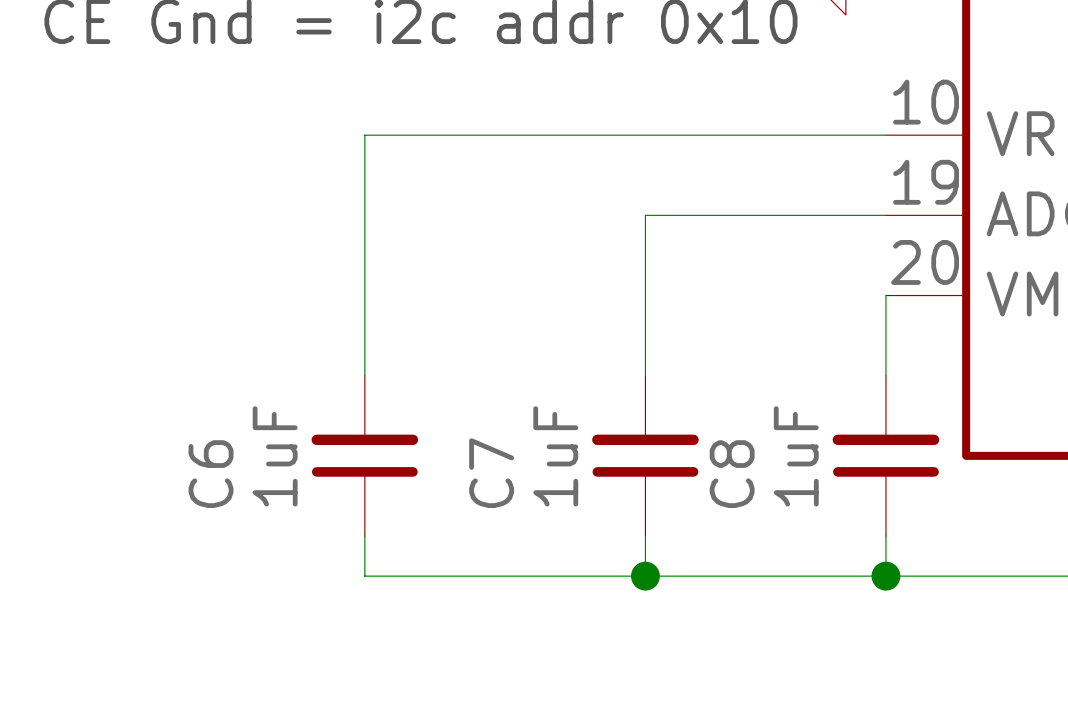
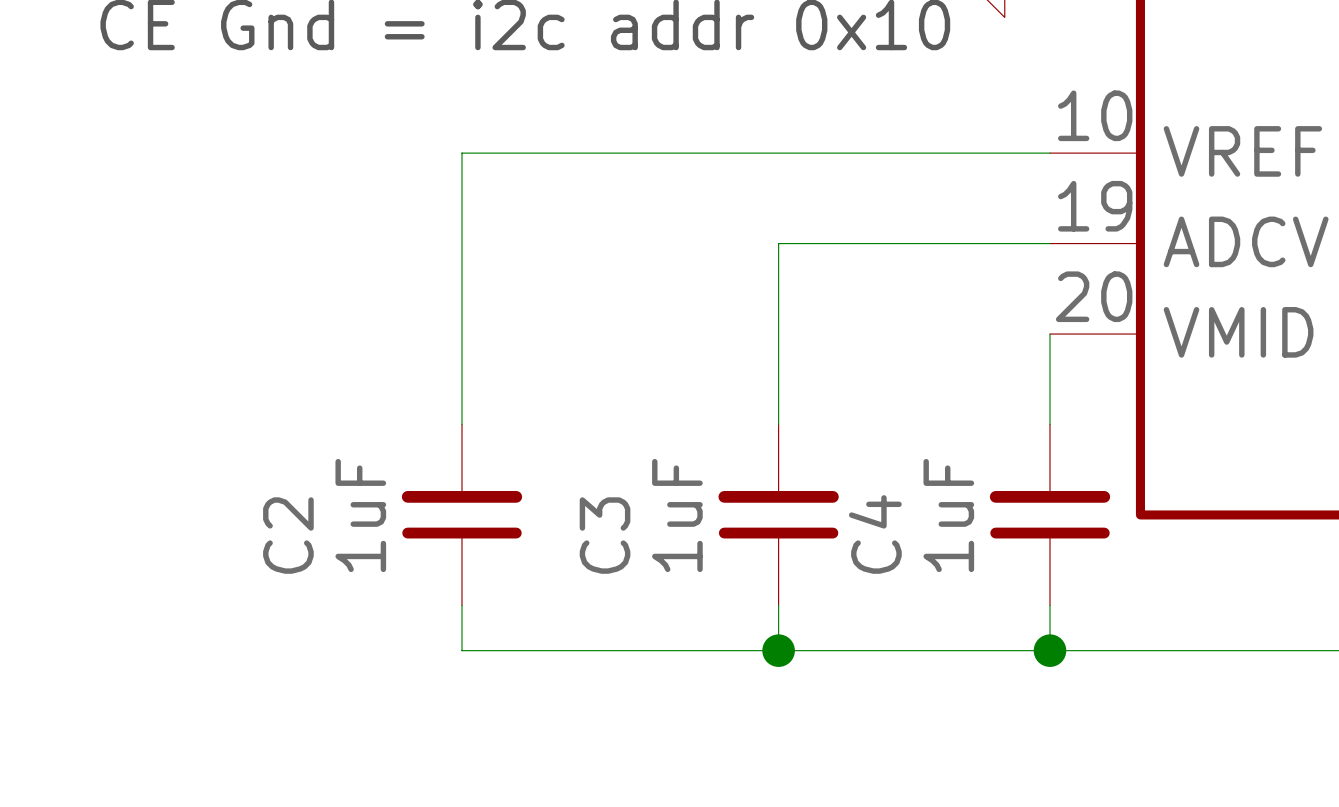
C7 name: C7 (491, 473) -> C3 (605, 535)
C6 name: C6 (211, 474) -> C2 (288, 535)
C8 name: C8 (732, 474) -> C4 (875, 534)

